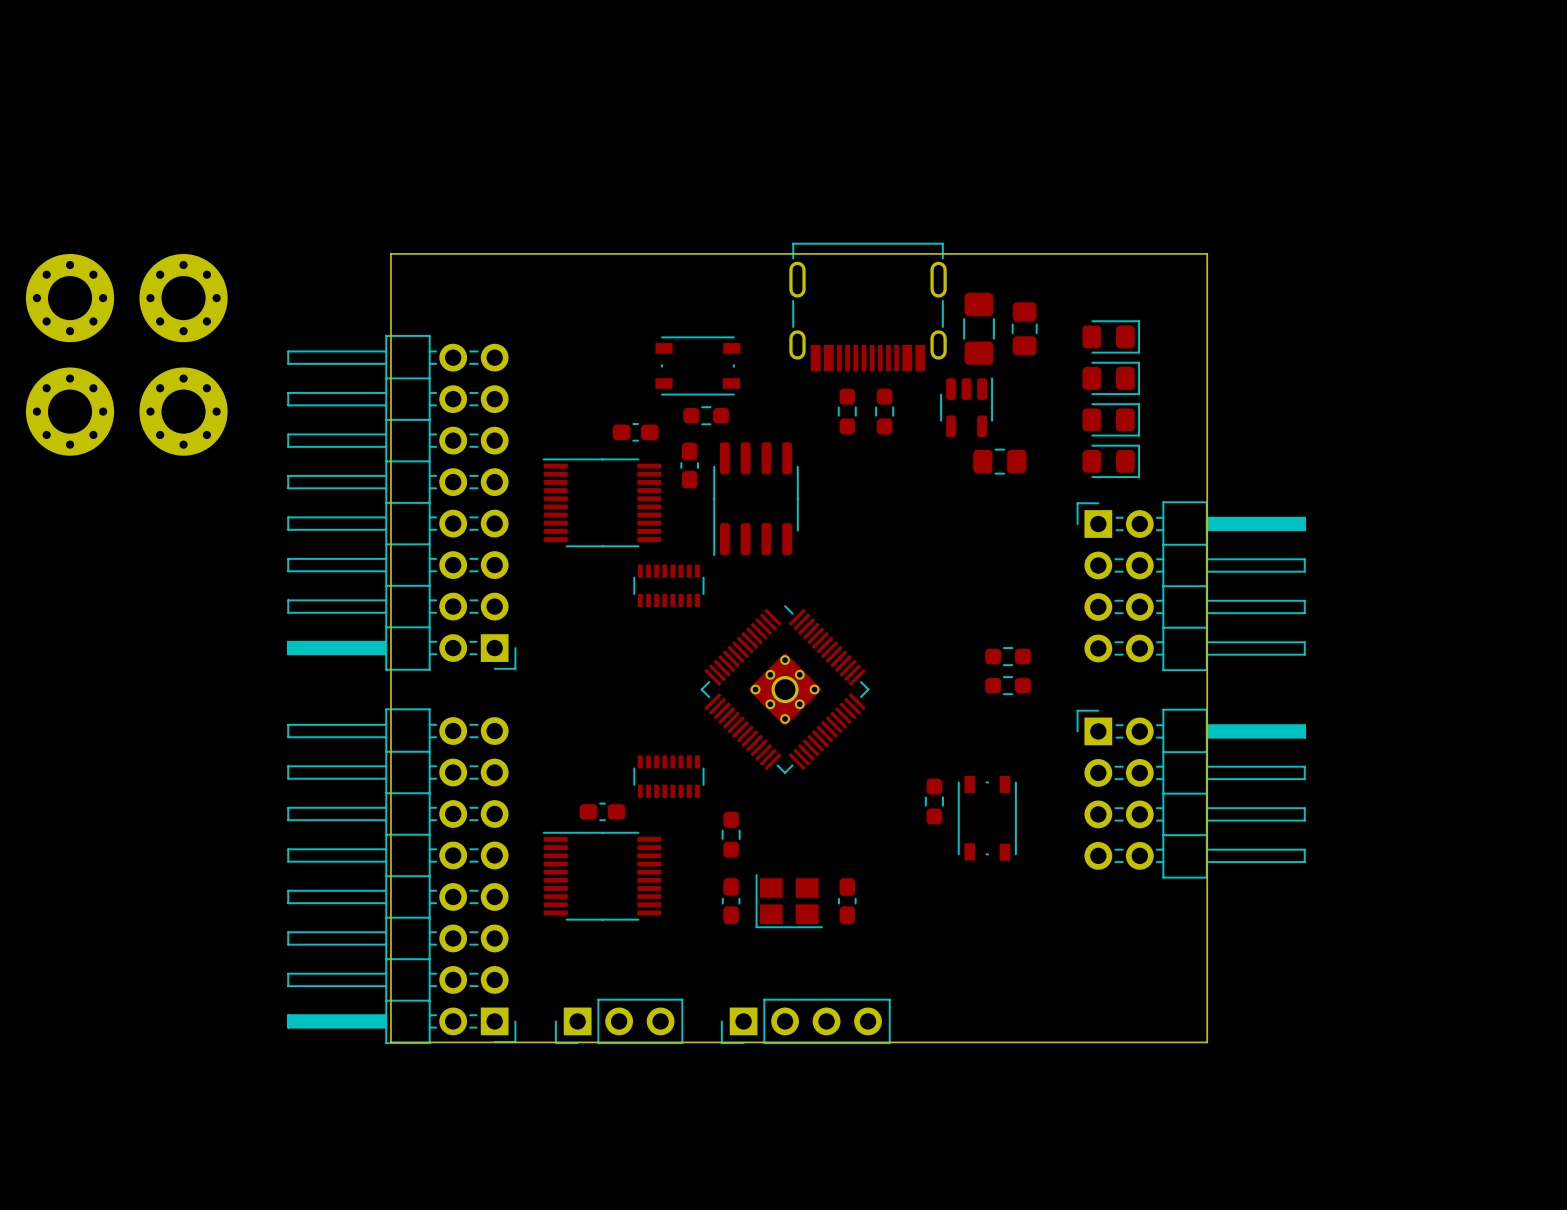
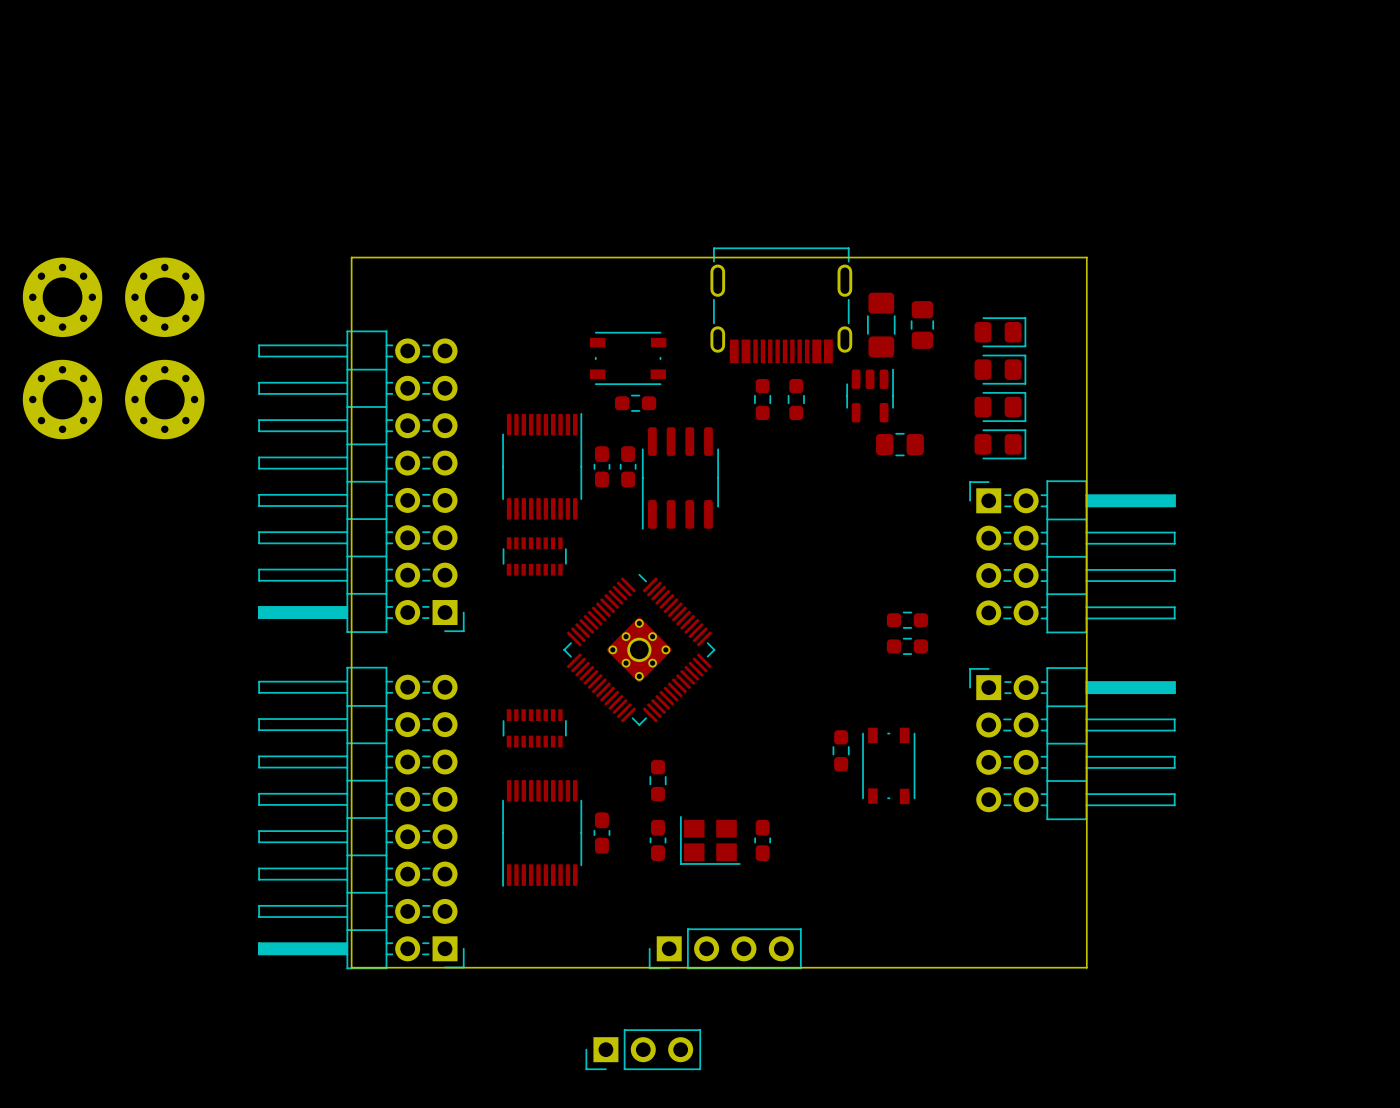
part: (635, 432) -> none
part: (689, 465) -> none
part: none -> (601, 466)
part: none -> (628, 466)
part rotation: 0° (602, 502) -> 90° clockwise (542, 466)
part position: (668, 585) -> (534, 556)
part position: (785, 689) -> (639, 649)
part position: (668, 776) -> (534, 728)
part rotation: 0° (602, 811) -> 90° clockwise (601, 832)
part position: (602, 811) -> (601, 832)
part rotation: 0° (602, 876) -> 90° counterclockwise (542, 833)
part position: (619, 1021) -> (643, 1049)

